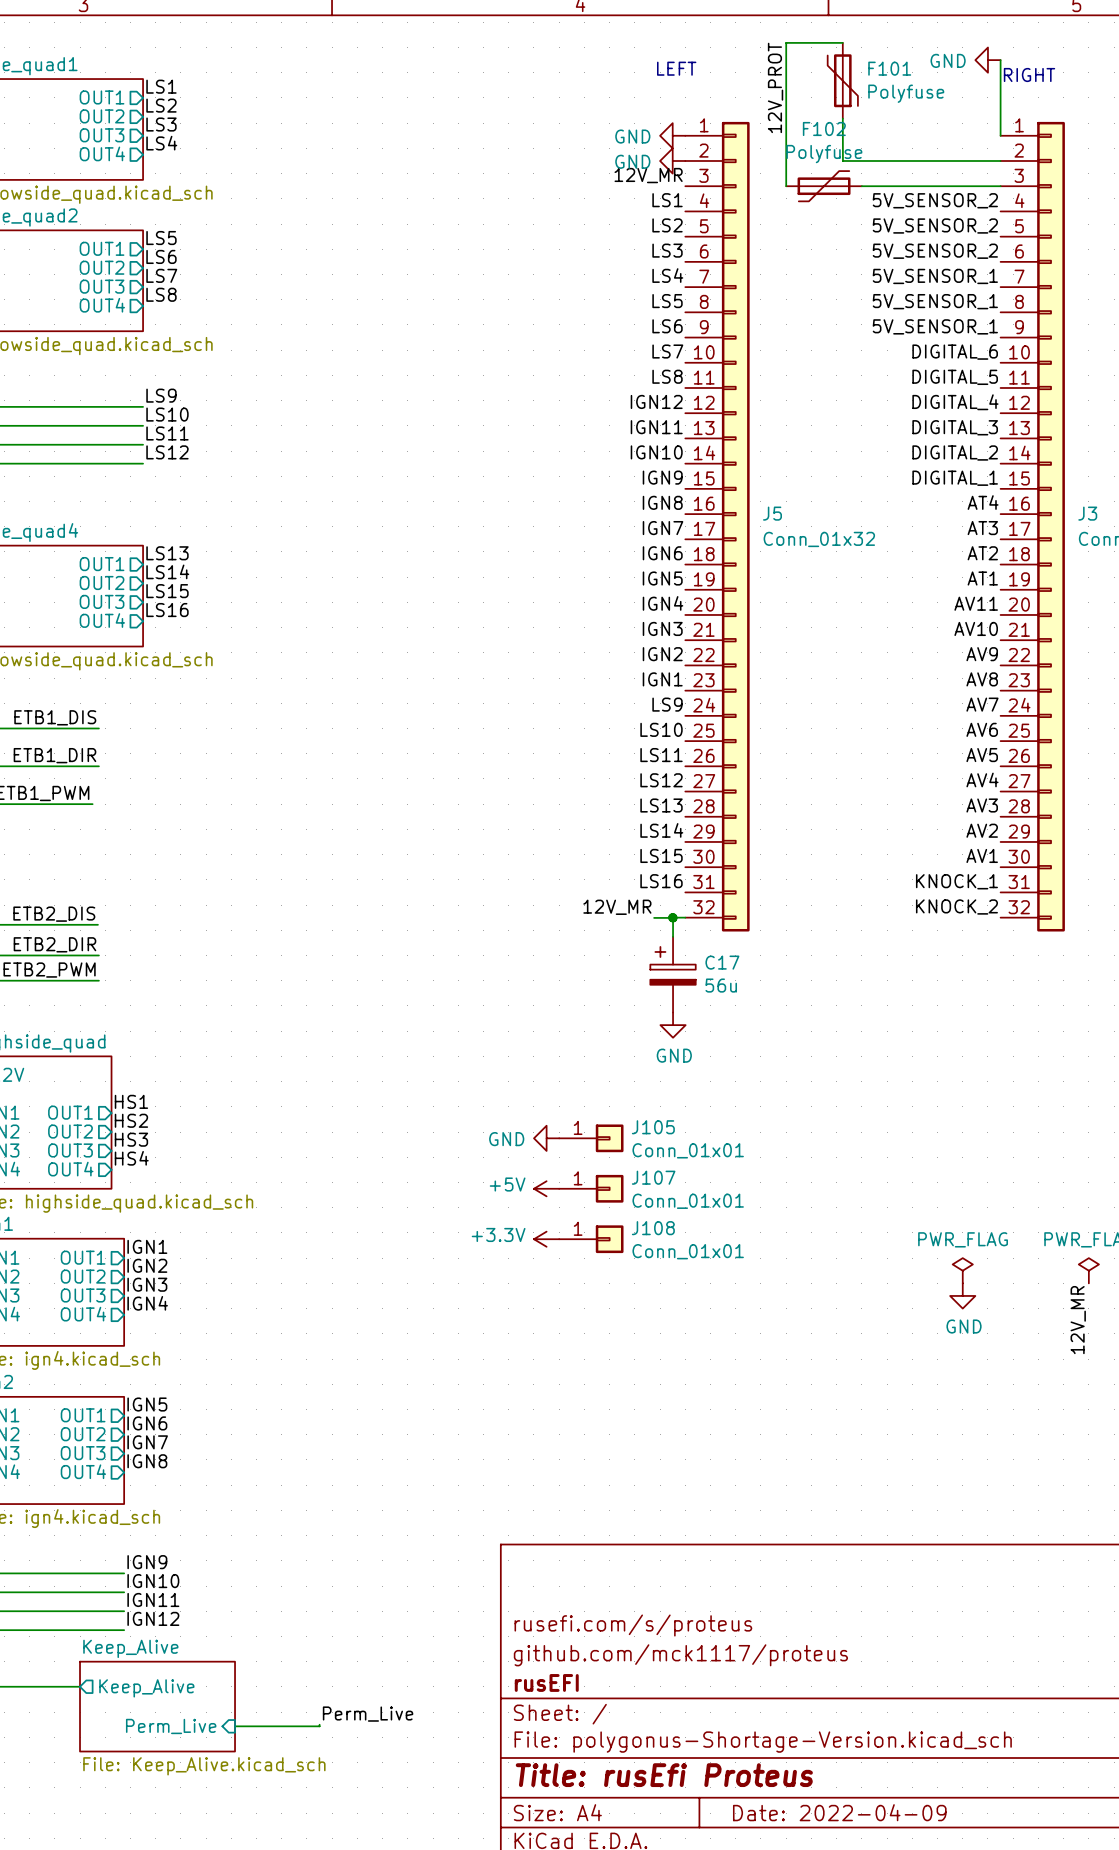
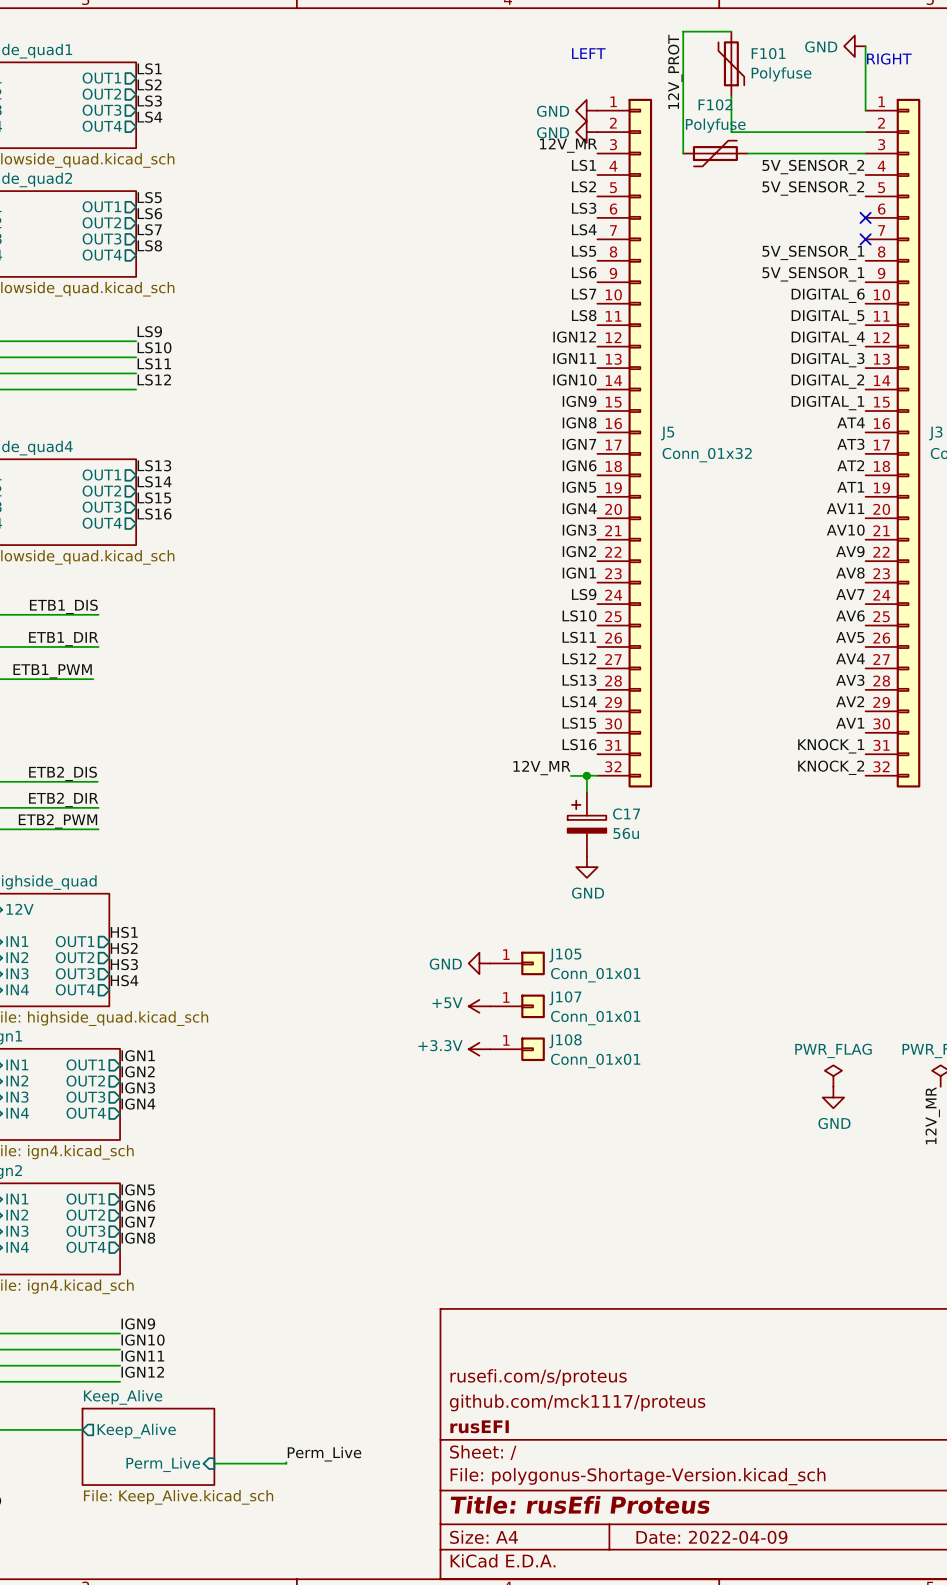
label: 5V_SENSOR_2 (935, 251) -> none
no-connect mark: none -> (865, 217)
label: 5V_SENSOR_1 (935, 276) -> none
no-connect mark: none -> (865, 239)

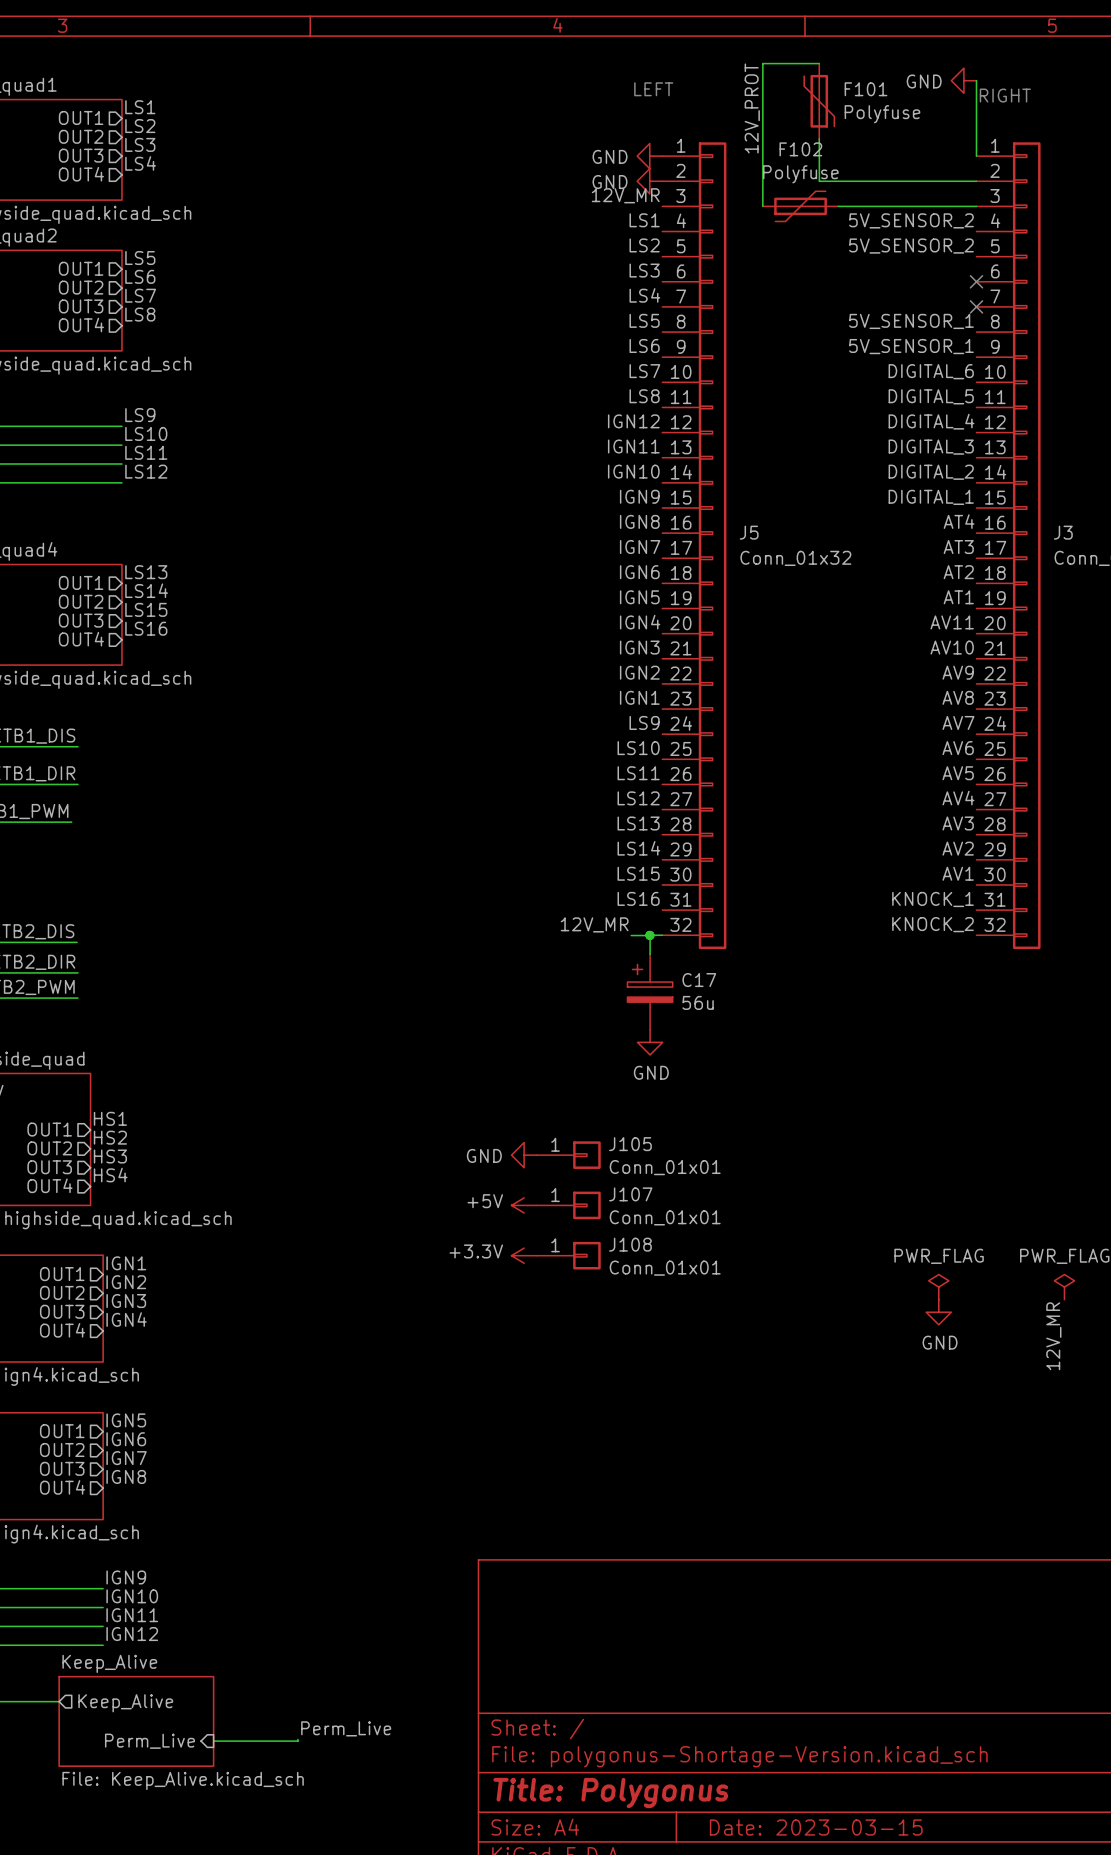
title block: rusefi.com/s/proteus (538, 1377) -> none
title block: github.com/mck1117/proteus (577, 1402) -> none
title block: rusEFI (479, 1426) -> none
title block: Title: rusEfi Proteus (580, 1504) -> Title: Polygonus (610, 1793)
title block: Date: 2022-04-09 (711, 1537) -> Date: 2023-03-15 (816, 1827)

